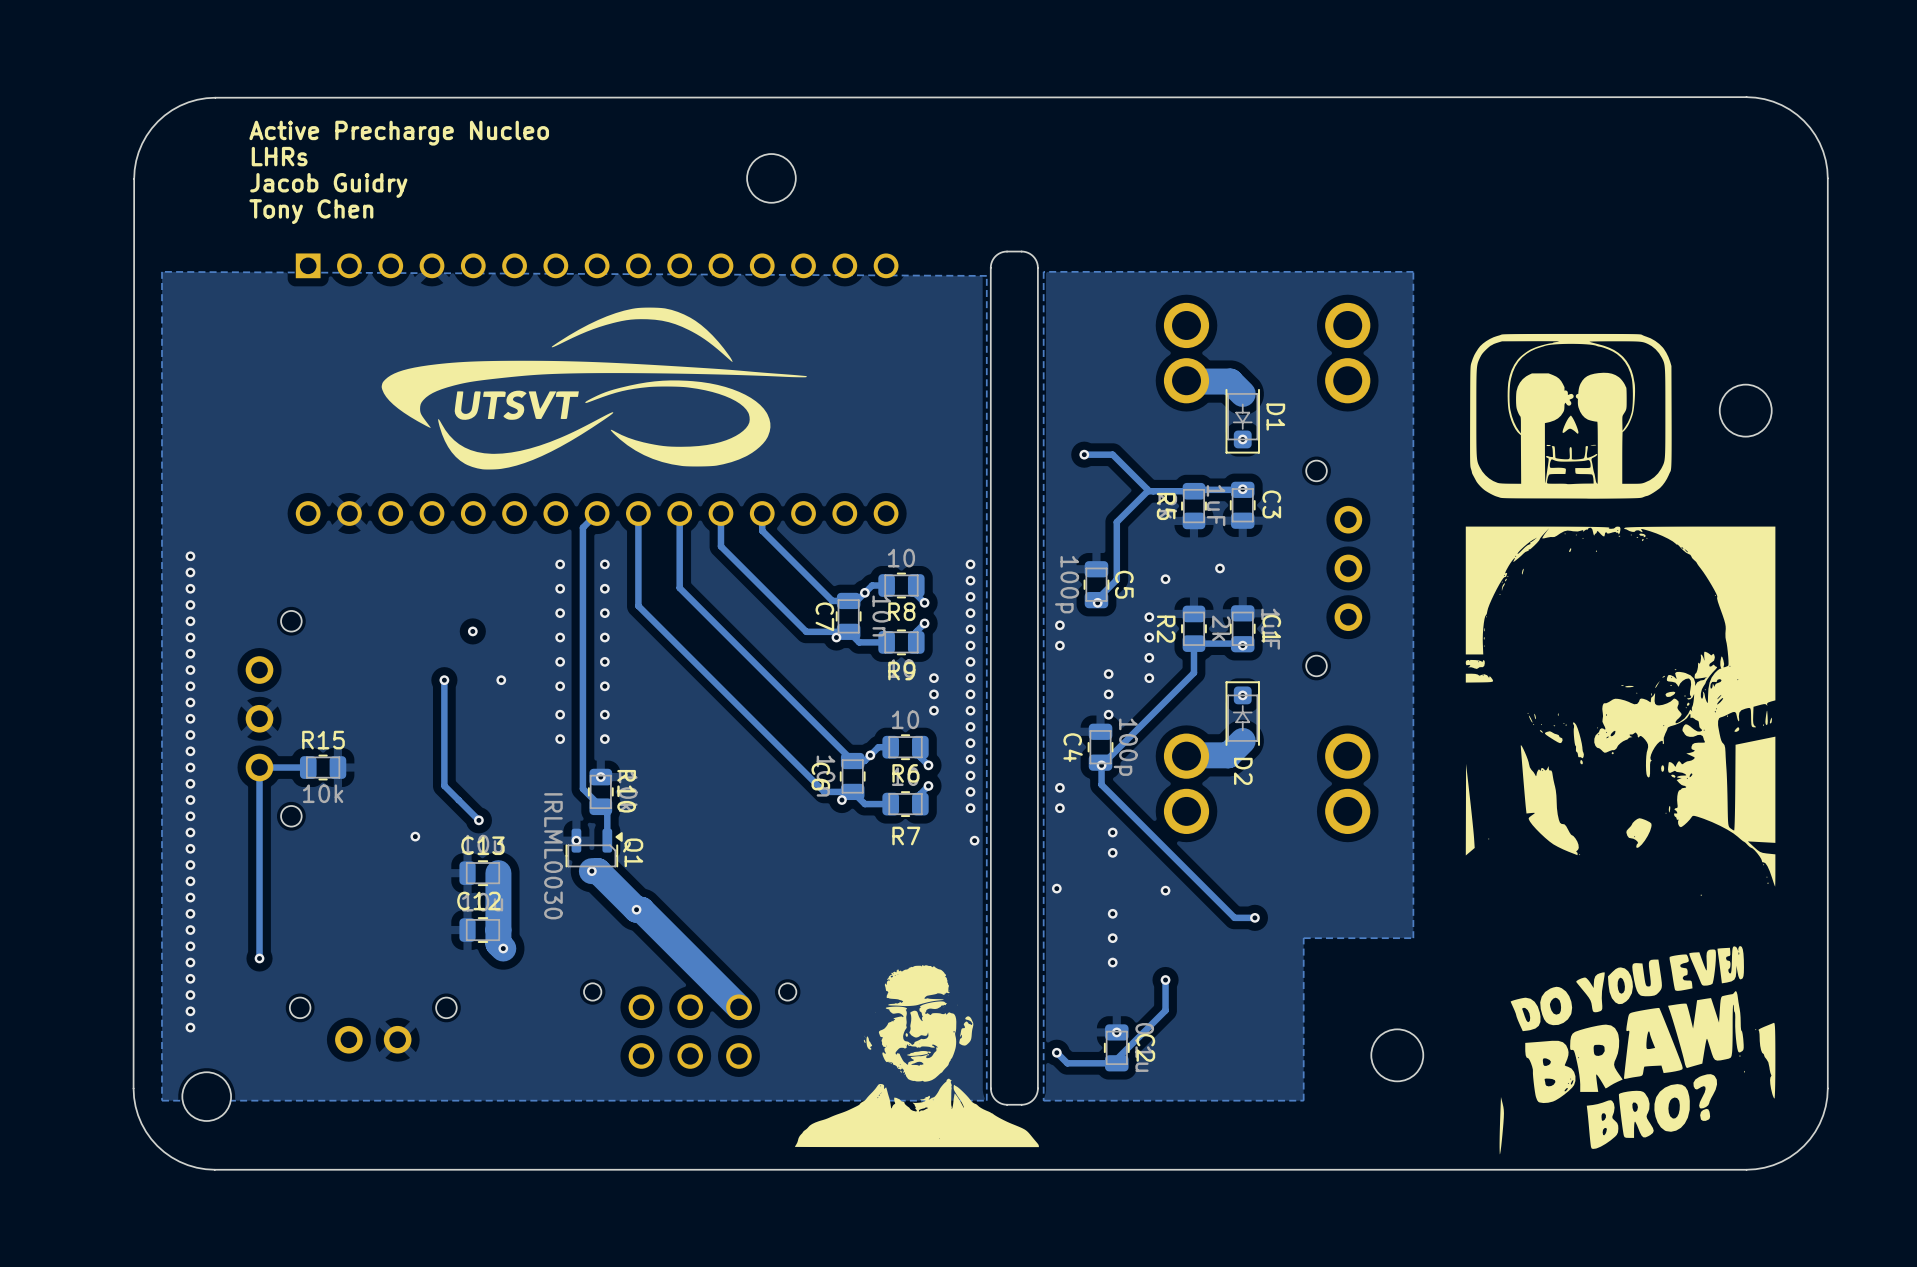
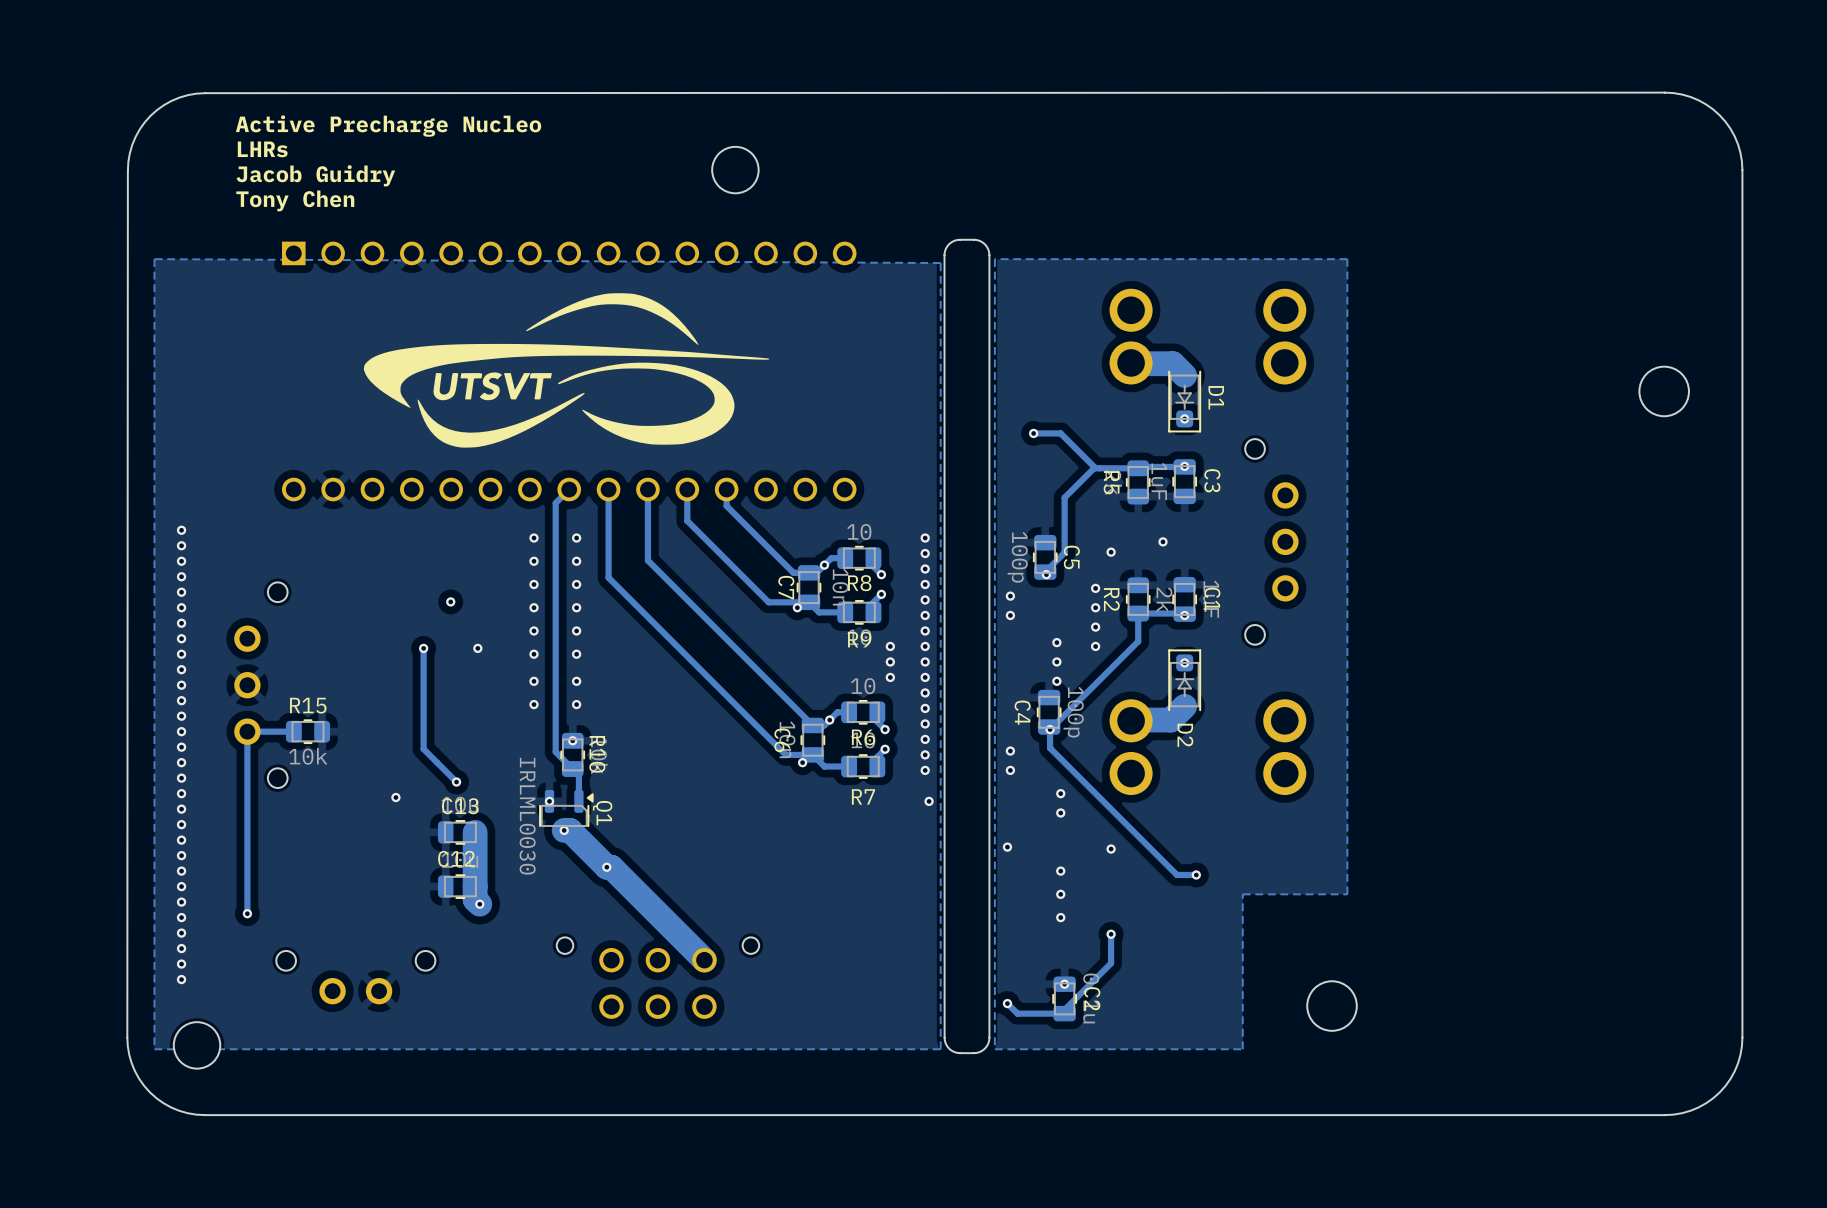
part: (1570, 416) -> none
drawing: [1465, 526, 1776, 1155] -> none
drawing: [794, 965, 1039, 1148] -> none

